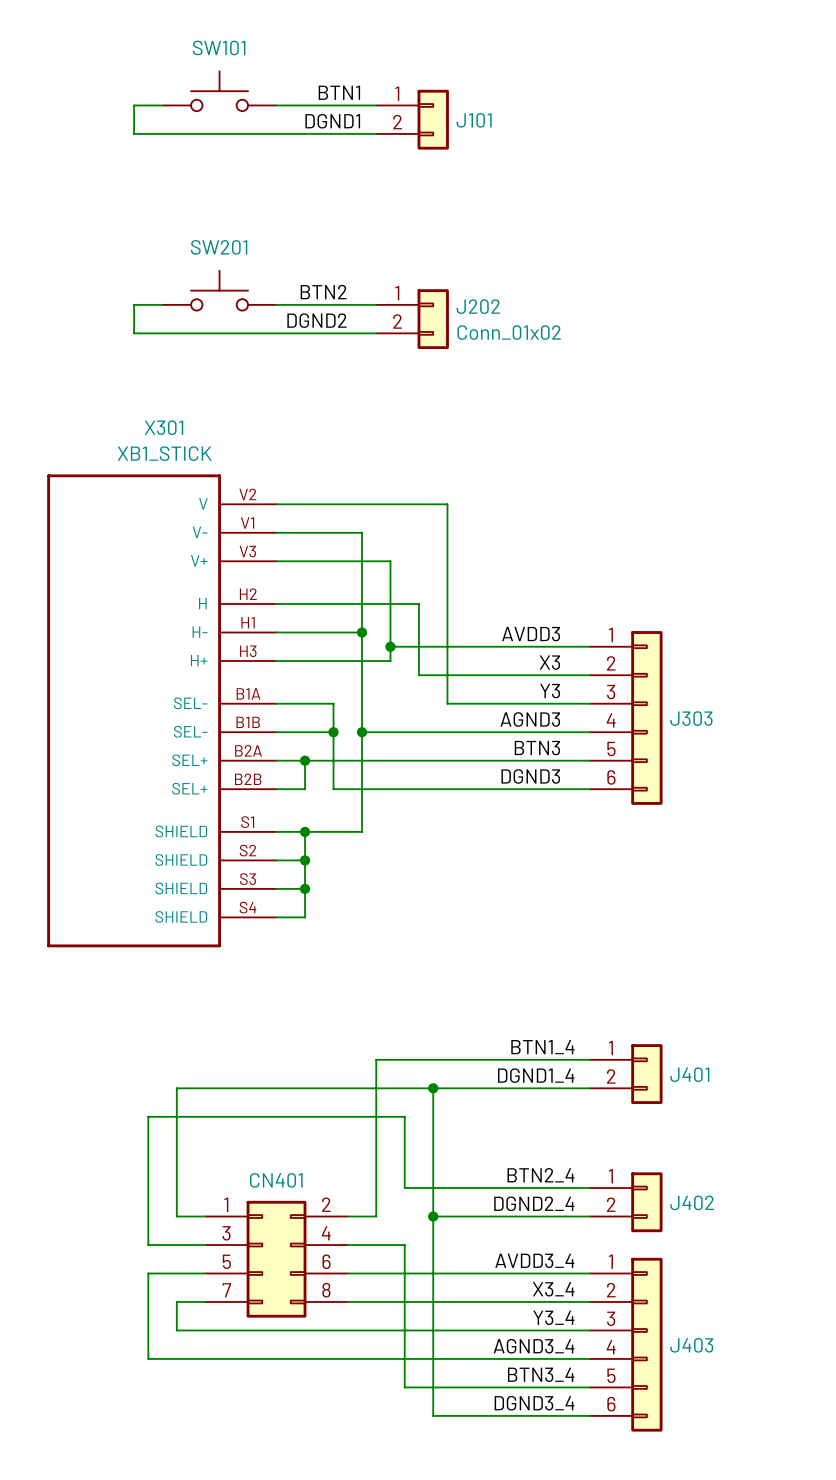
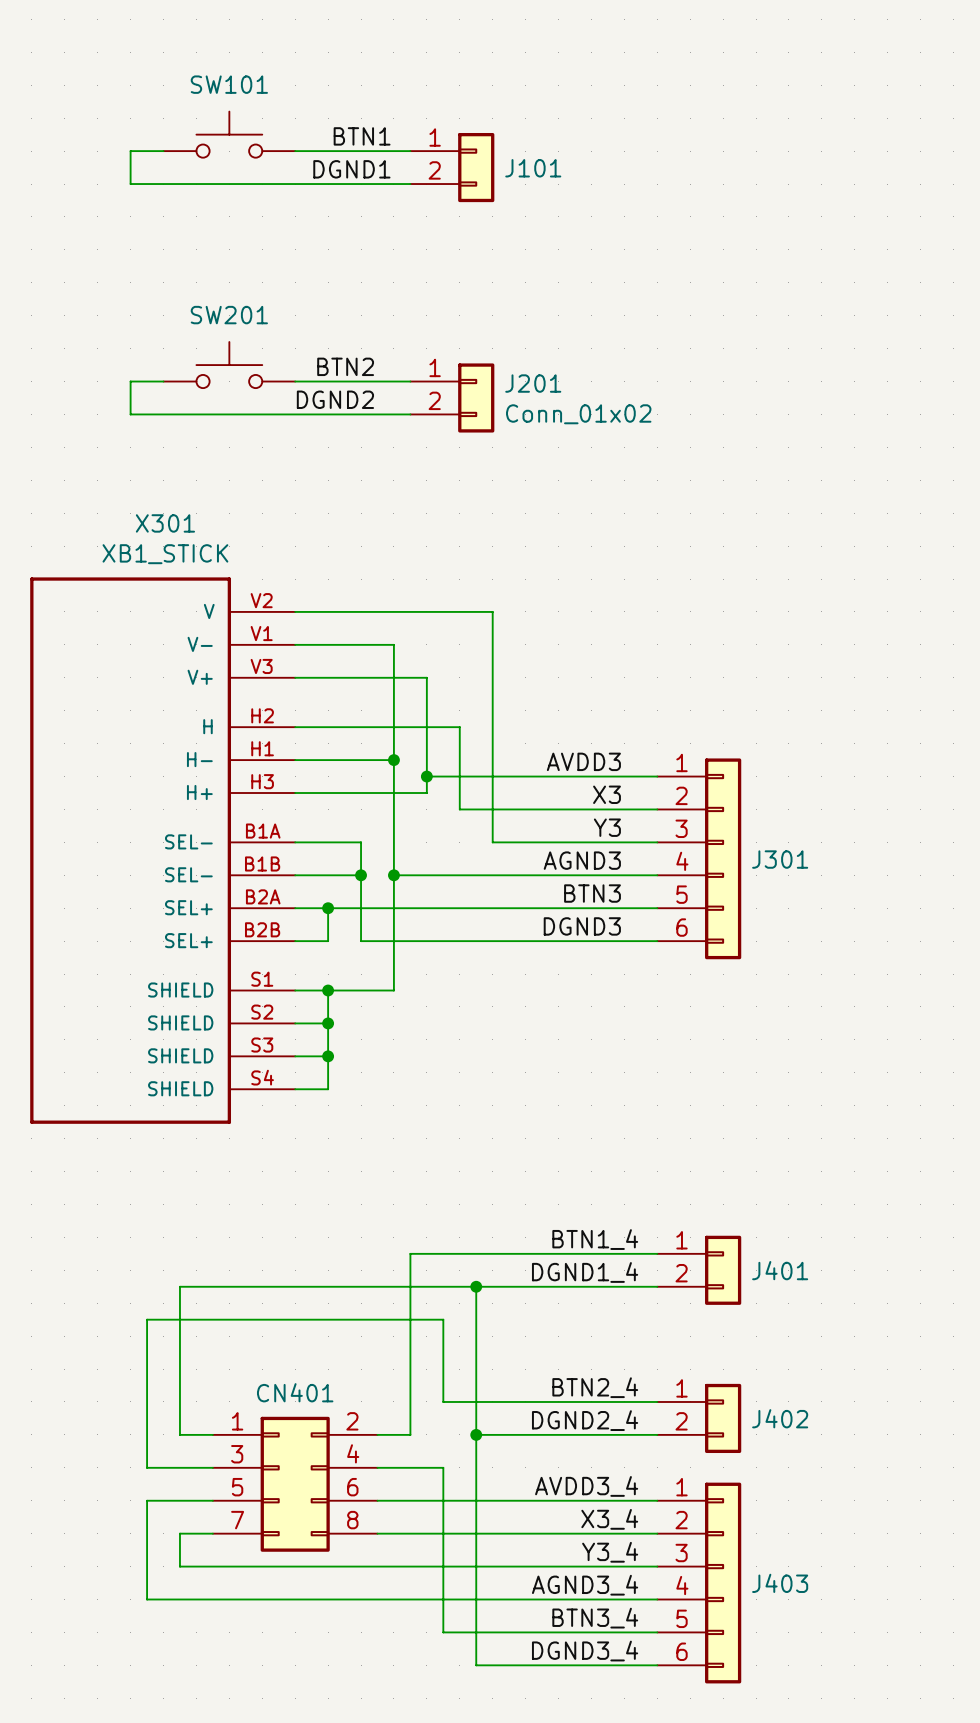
J202 name: J202 (478, 306) -> J201 (533, 383)
J303 name: J303 (691, 718) -> J301 (780, 859)

